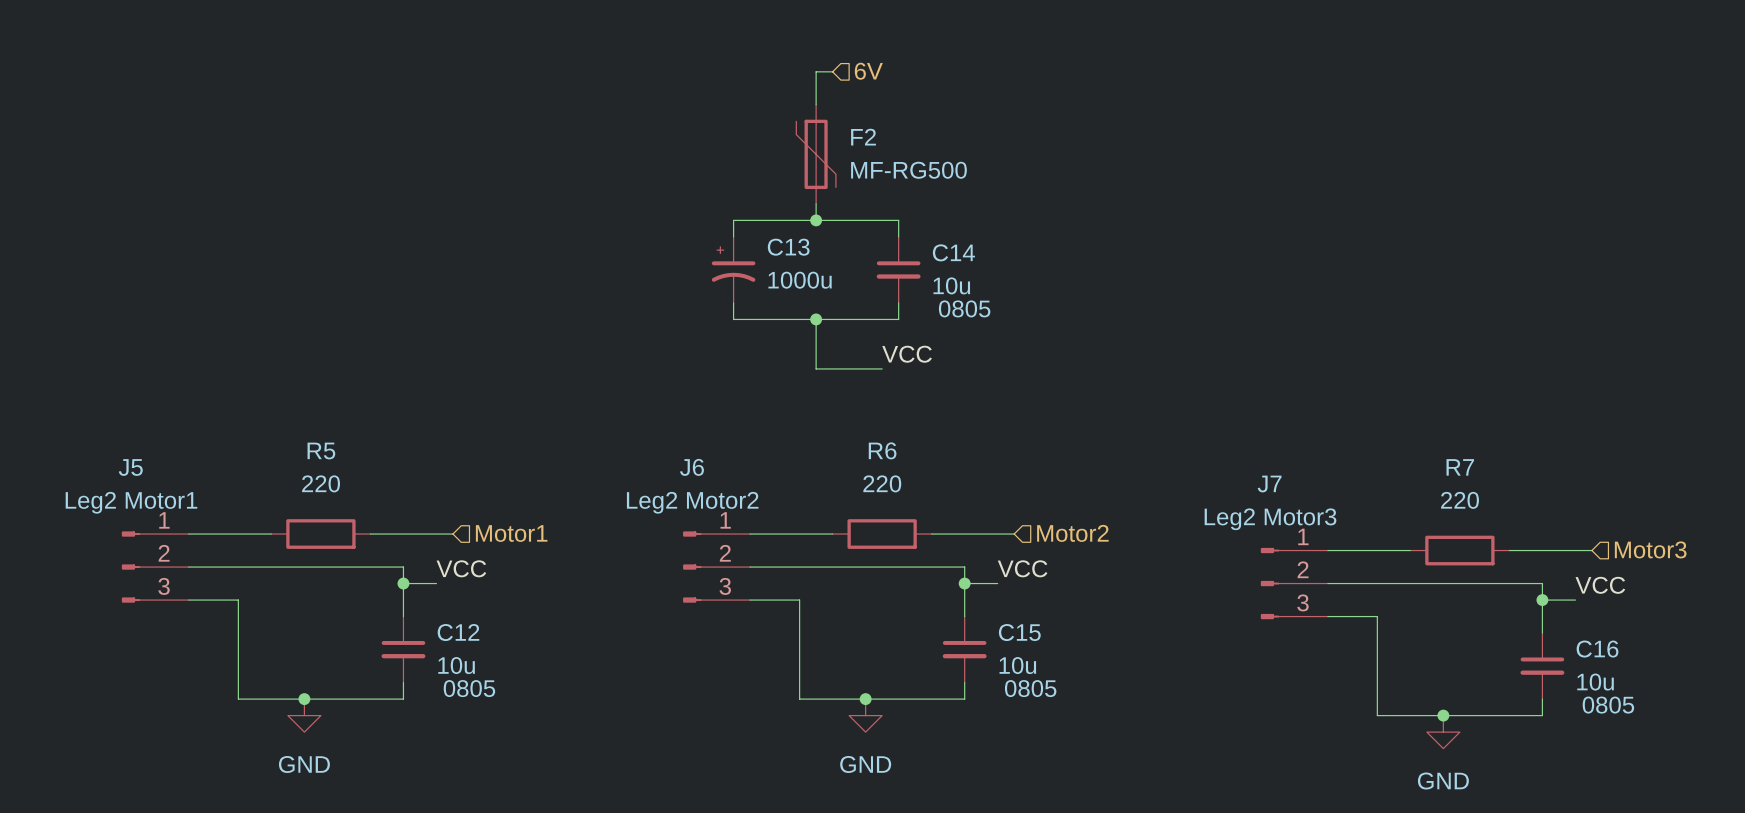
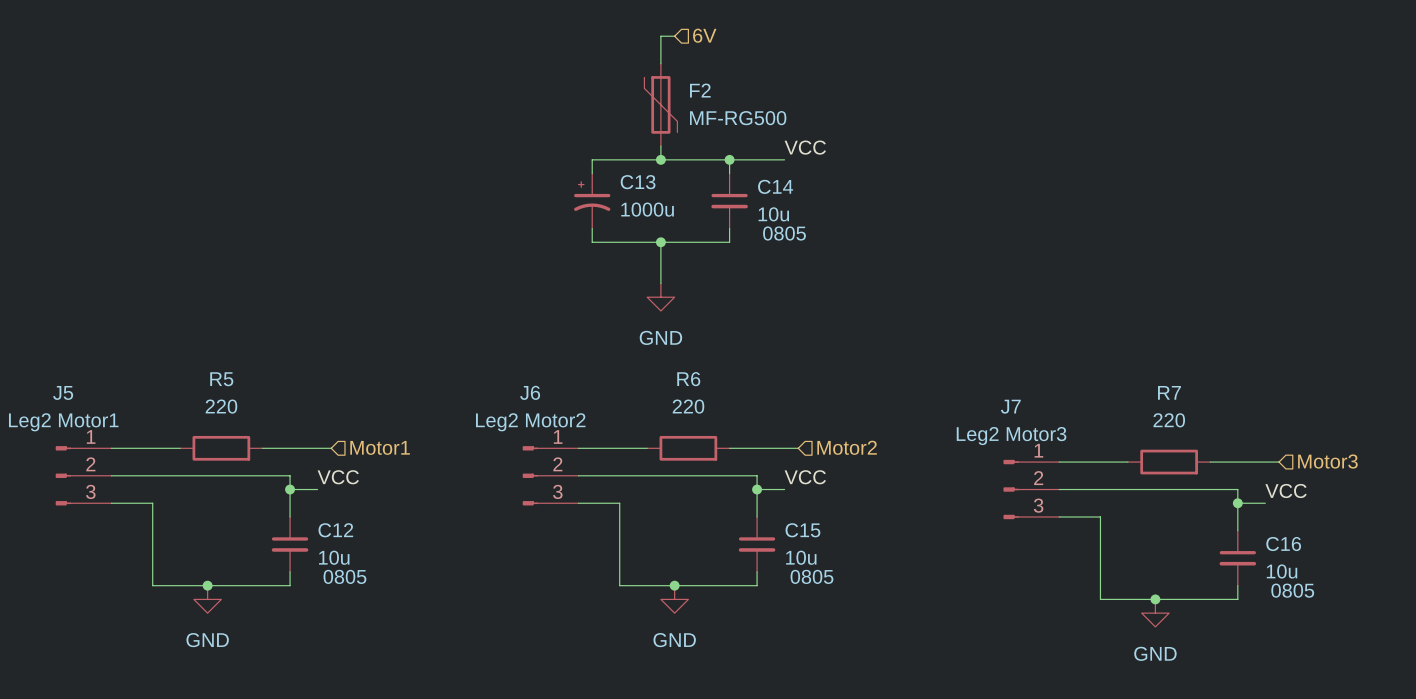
wire: (832, 71) (816, 71) (816, 104) -> (674, 36) (660, 36) (660, 63)
hierarchical label position: 6V (868, 71) -> 6V (704, 35)
F2 position: (816, 154) -> (660, 104)
junction: none -> (660, 159)
wire: none -> (729, 159) (729, 173)
junction: none -> (729, 159)
wire: none -> (784, 159) (592, 159) (592, 173)
wire: (816, 203) (816, 220) -> (660, 146) (660, 159)
junction: (816, 220) -> none
wire: (733, 236) (733, 220) (898, 220) (898, 236) -> none
C13 position: (733, 269) -> (592, 201)
C14 position: (898, 269) -> (729, 201)
wire: none -> (660, 242) (660, 283)
junction: none -> (660, 242)
wire: (733, 302) (733, 319) (898, 319) (898, 302) -> (592, 228) (592, 242) (729, 242) (729, 228)
wire: (816, 319) (816, 368) (882, 368) -> none
junction: (816, 319) -> none
power symbol: none -> GND (660, 297)
label position: VCC (907, 354) -> VCC (805, 147)

